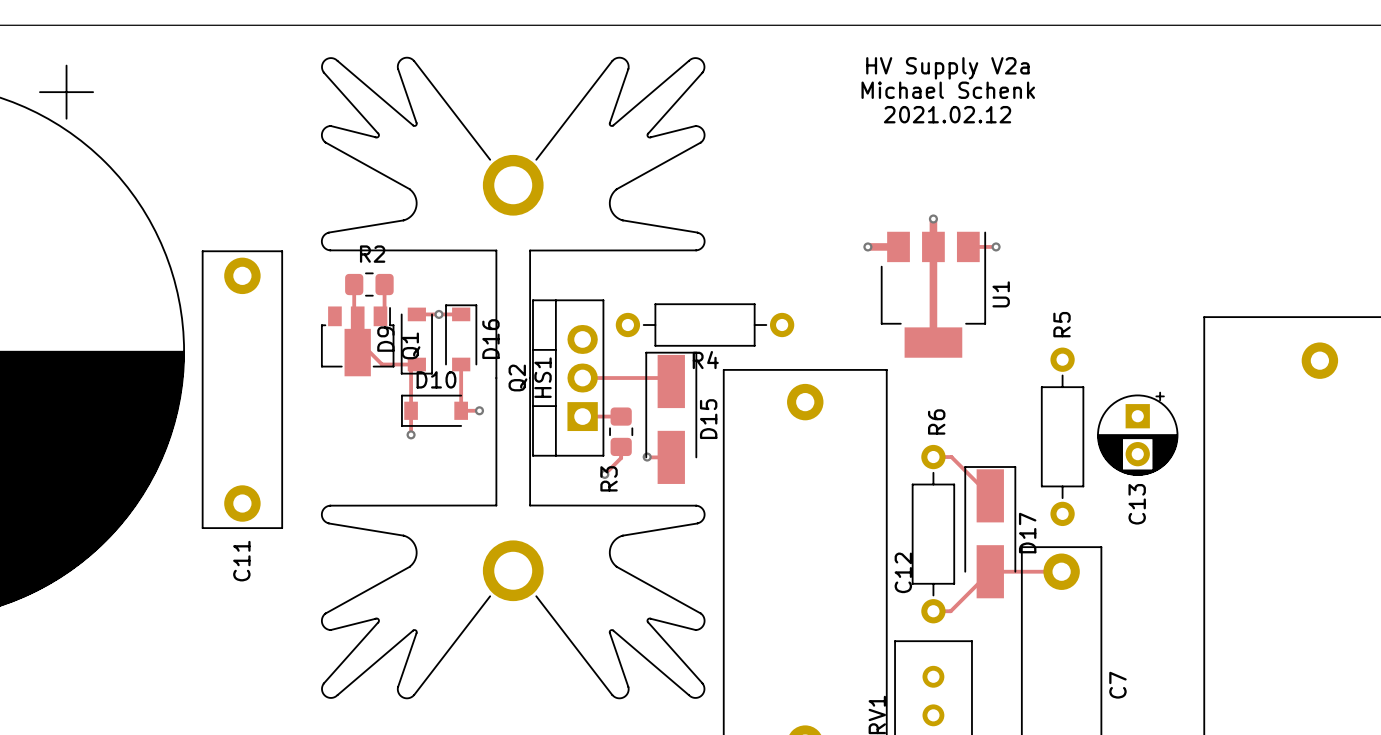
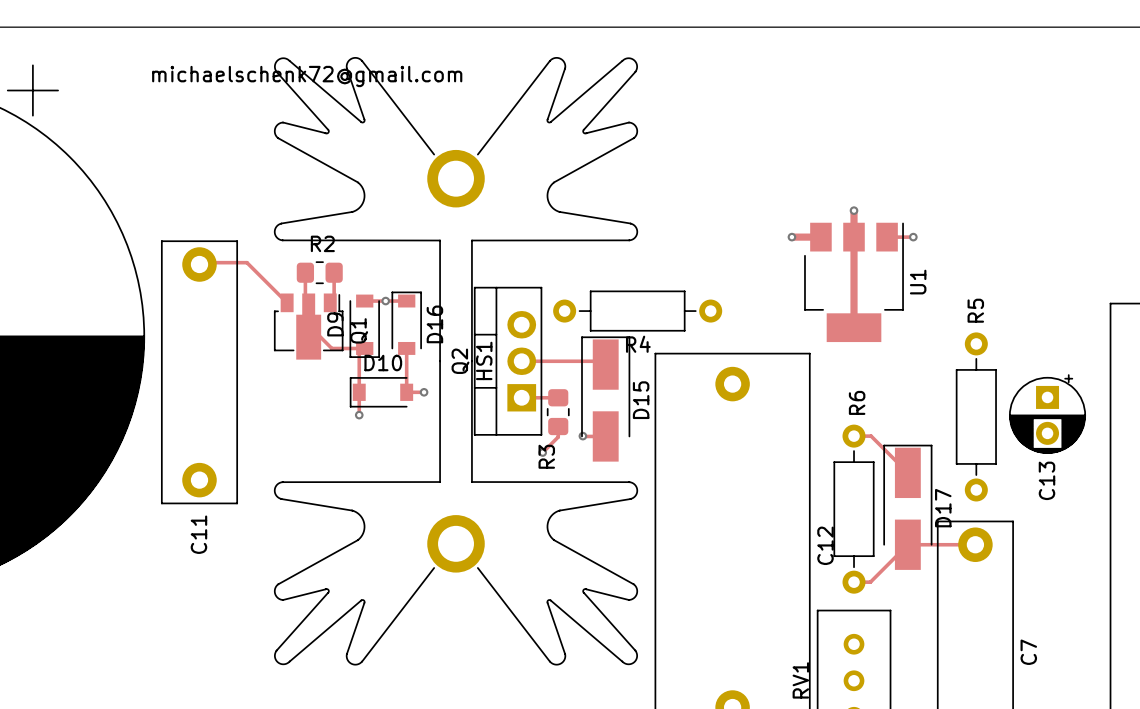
text: HV Supply V2a (947, 68) -> none
text: none -> michaelschenk72@gmail.com (307, 76)
text: Michael Schenk (948, 90) -> none
text: 2021.02.12 (947, 114) -> none
track: none -> (200, 262) (246, 262) (287, 302)

